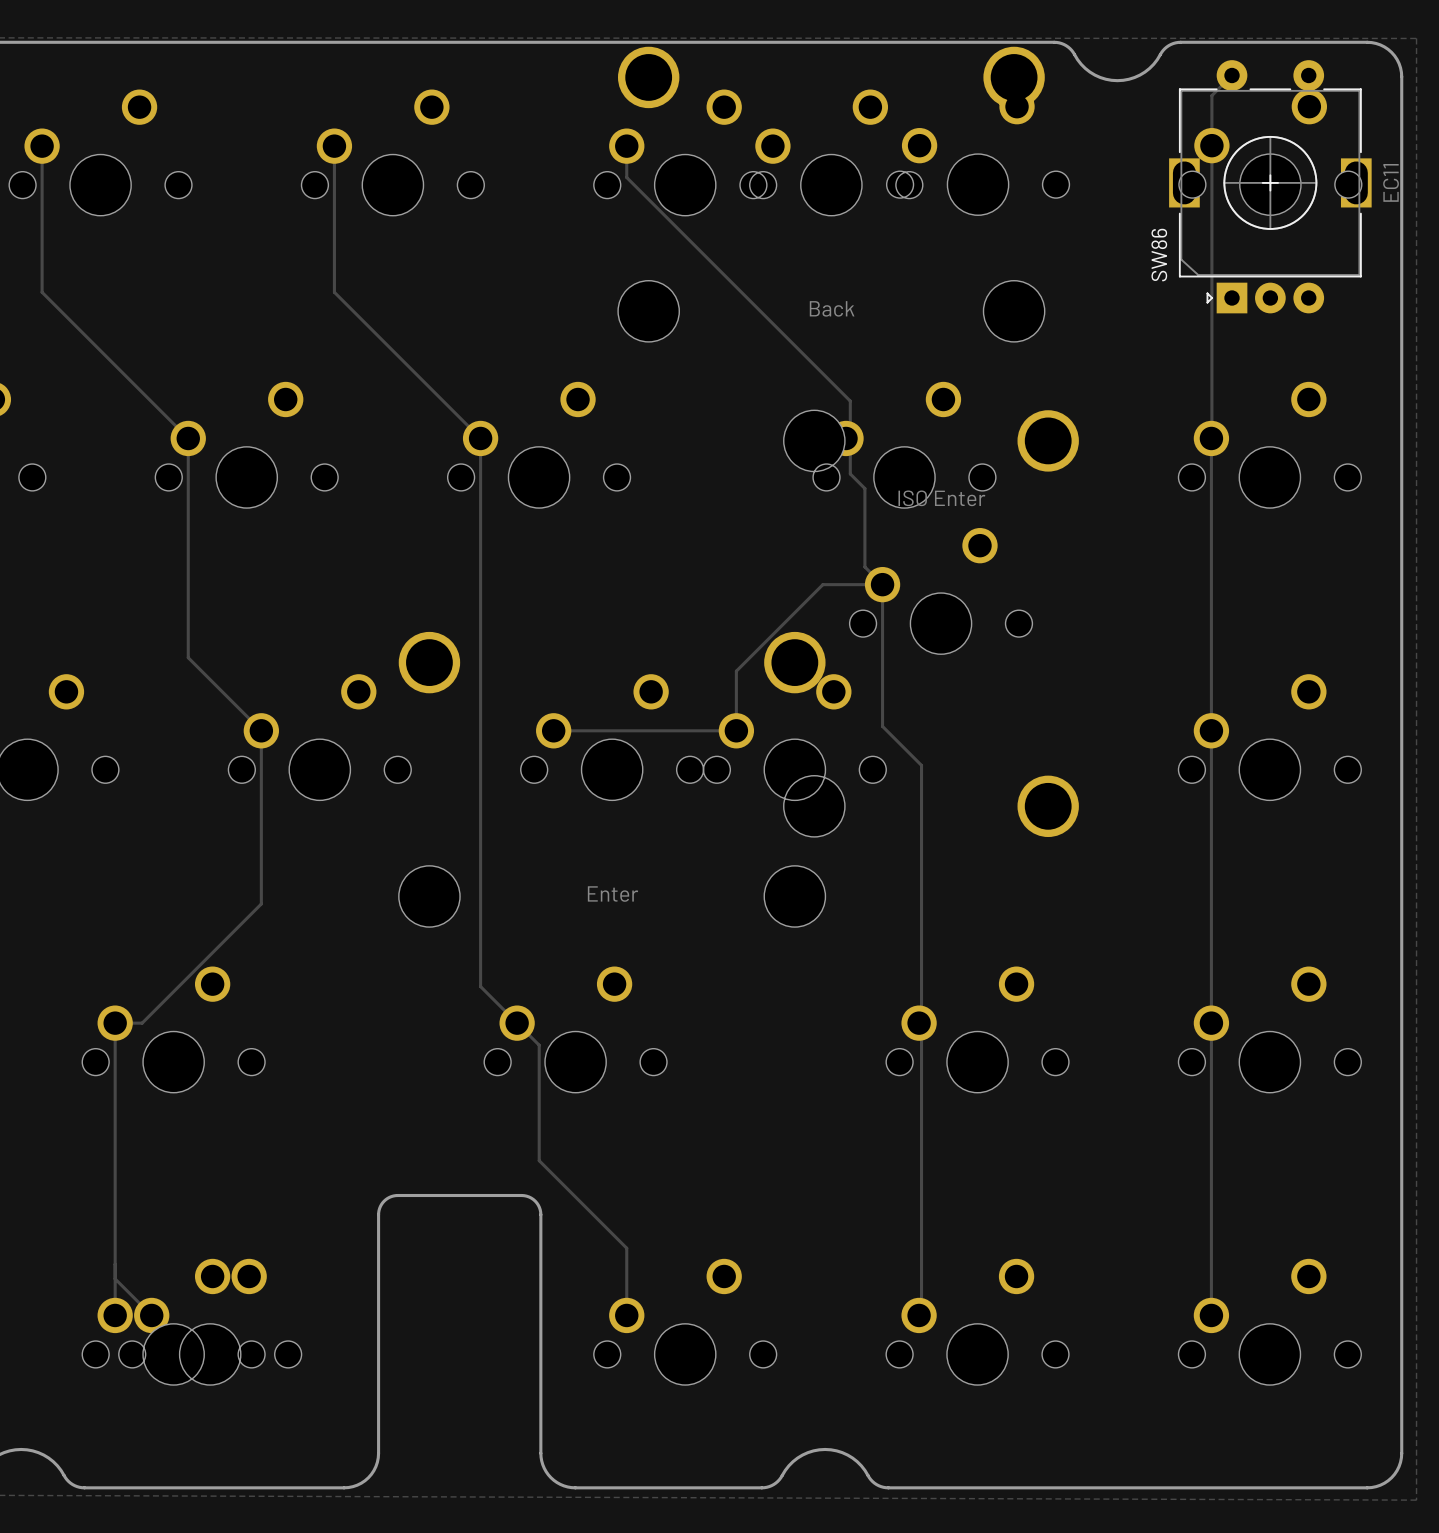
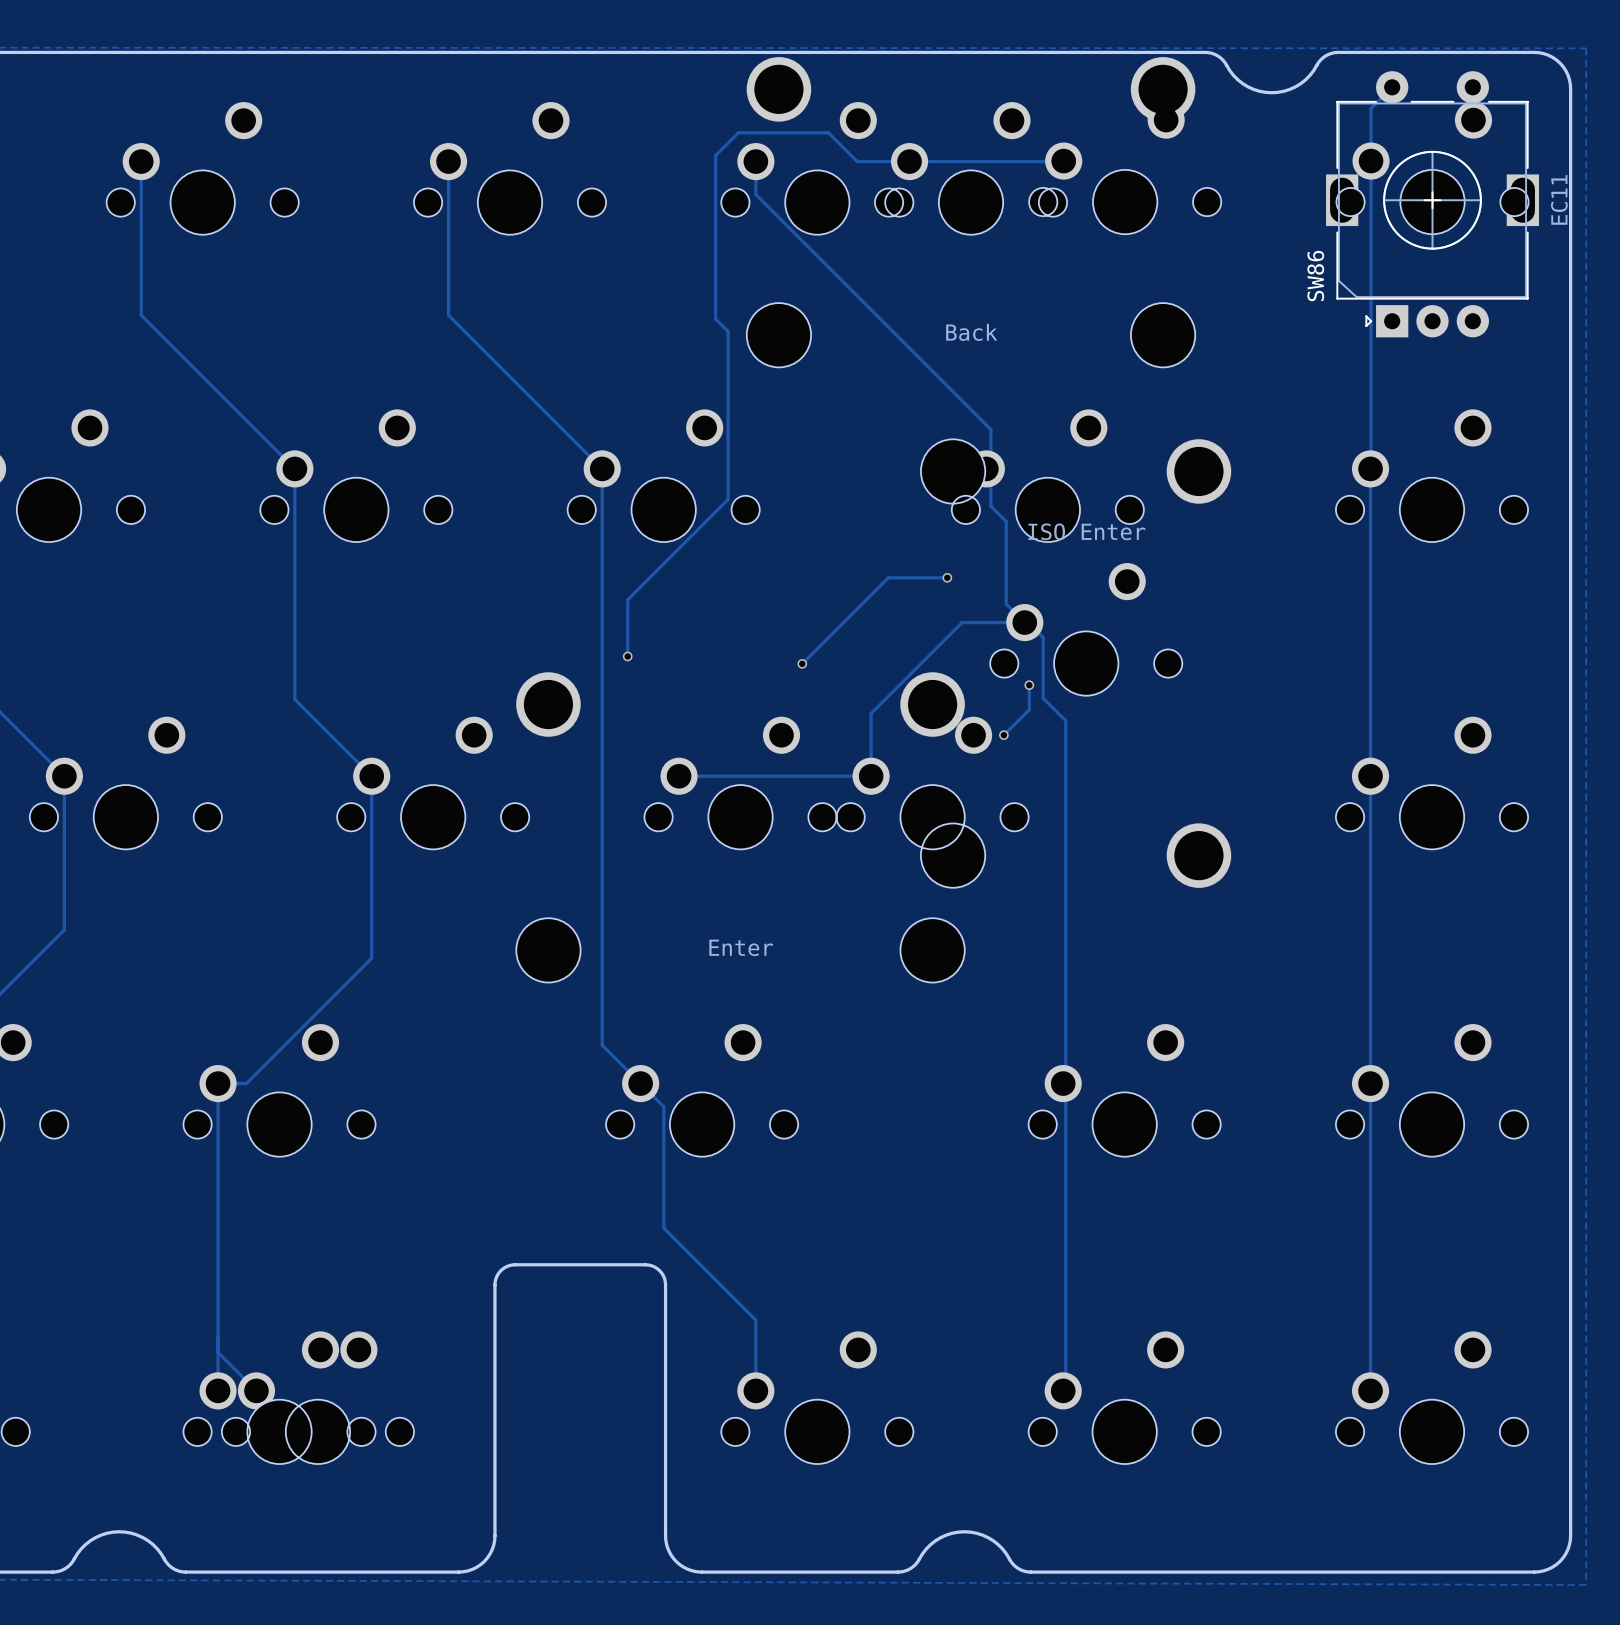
track: none -> (1063, 161) (857, 161) (828, 132) (738, 132) (715, 155) (715, 319) (728, 331) (728, 499) (627, 599) (627, 656)
track: none -> (947, 577) (888, 577) (802, 663)
via: none -> (947, 577)
track: (882, 584) (882, 726) (921, 765) -> (1024, 622) (1028, 622) (1043, 637) (1043, 698) (1065, 720) (1065, 812)
via: none -> (627, 656)
via: none -> (802, 663)
track: none -> (1029, 685) (1029, 709) (1003, 735)
via: none -> (1029, 685)
via: none -> (1003, 735)

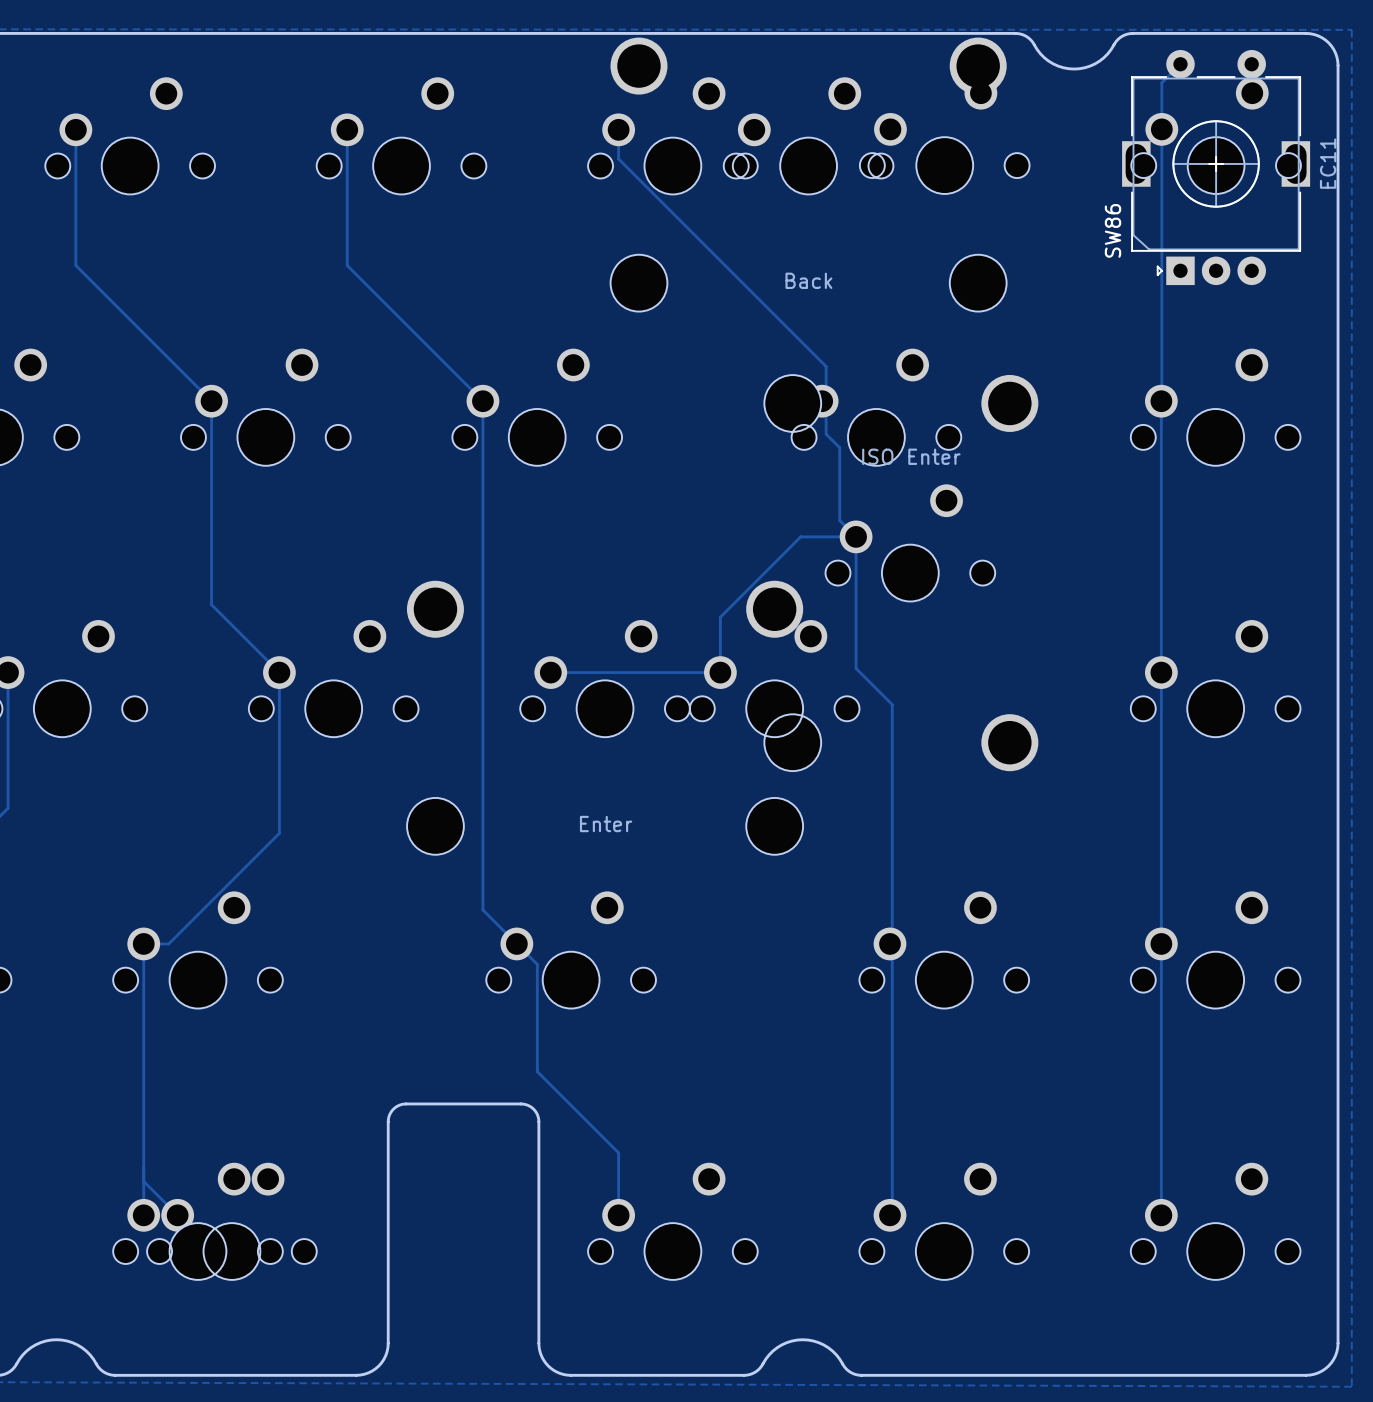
track: (1063, 161) (857, 161) (828, 132) (738, 132) (715, 155) (715, 319) (728, 331) (728, 499) (627, 599) (627, 656) -> none
track: (947, 577) (888, 577) (802, 663) -> none
via: (947, 577) -> none
track: (1024, 622) (1028, 622) (1043, 637) (1043, 698) (1065, 720) (1065, 812) -> (856, 536) (856, 668) (892, 704)
via: (627, 656) -> none
via: (802, 663) -> none
track: (1029, 685) (1029, 709) (1003, 735) -> none
via: (1029, 685) -> none
via: (1003, 735) -> none

